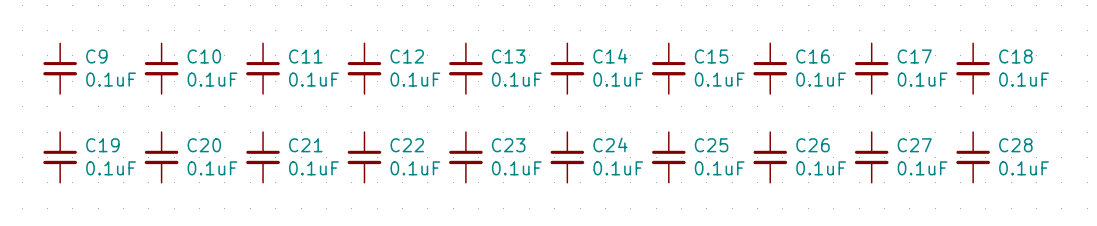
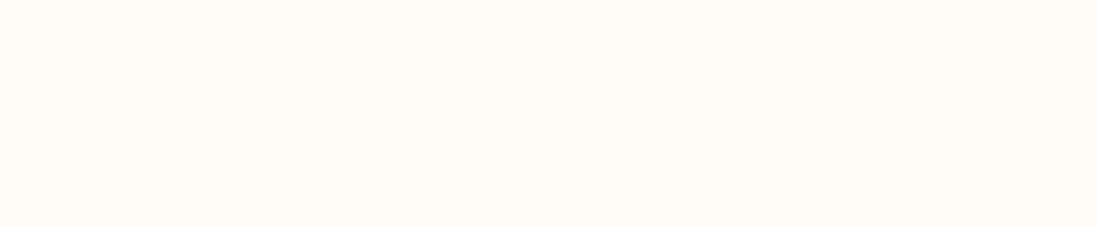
C9: 0.1uF (60, 68) -> none
C10: 0.1uF (161, 68) -> none
C11: 0.1uF (263, 68) -> none
C12: 0.1uF (364, 68) -> none
C13: 0.1uF (465, 68) -> none
C14: 0.1uF (567, 68) -> none
C15: 0.1uF (668, 68) -> none
C16: 0.1uF (770, 68) -> none
C17: 0.1uF (871, 68) -> none
C18: 0.1uF (973, 68) -> none
C19: 0.1uF (60, 157) -> none
C20: 0.1uF (161, 157) -> none
C21: 0.1uF (263, 157) -> none
C22: 0.1uF (364, 157) -> none
C23: 0.1uF (465, 157) -> none
C24: 0.1uF (567, 157) -> none
C25: 0.1uF (668, 157) -> none
C26: 0.1uF (770, 157) -> none
C27: 0.1uF (871, 157) -> none
C28: 0.1uF (973, 157) -> none

